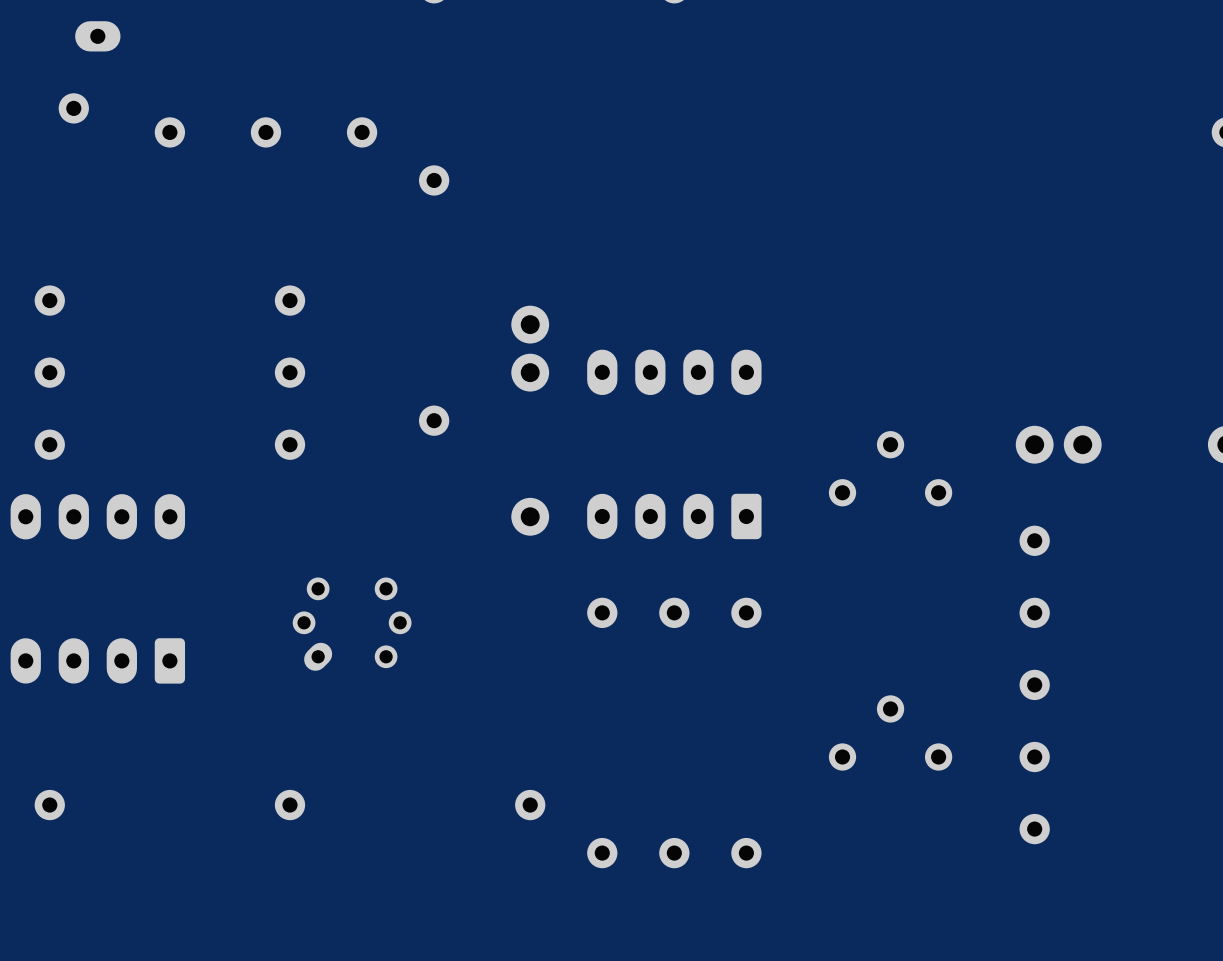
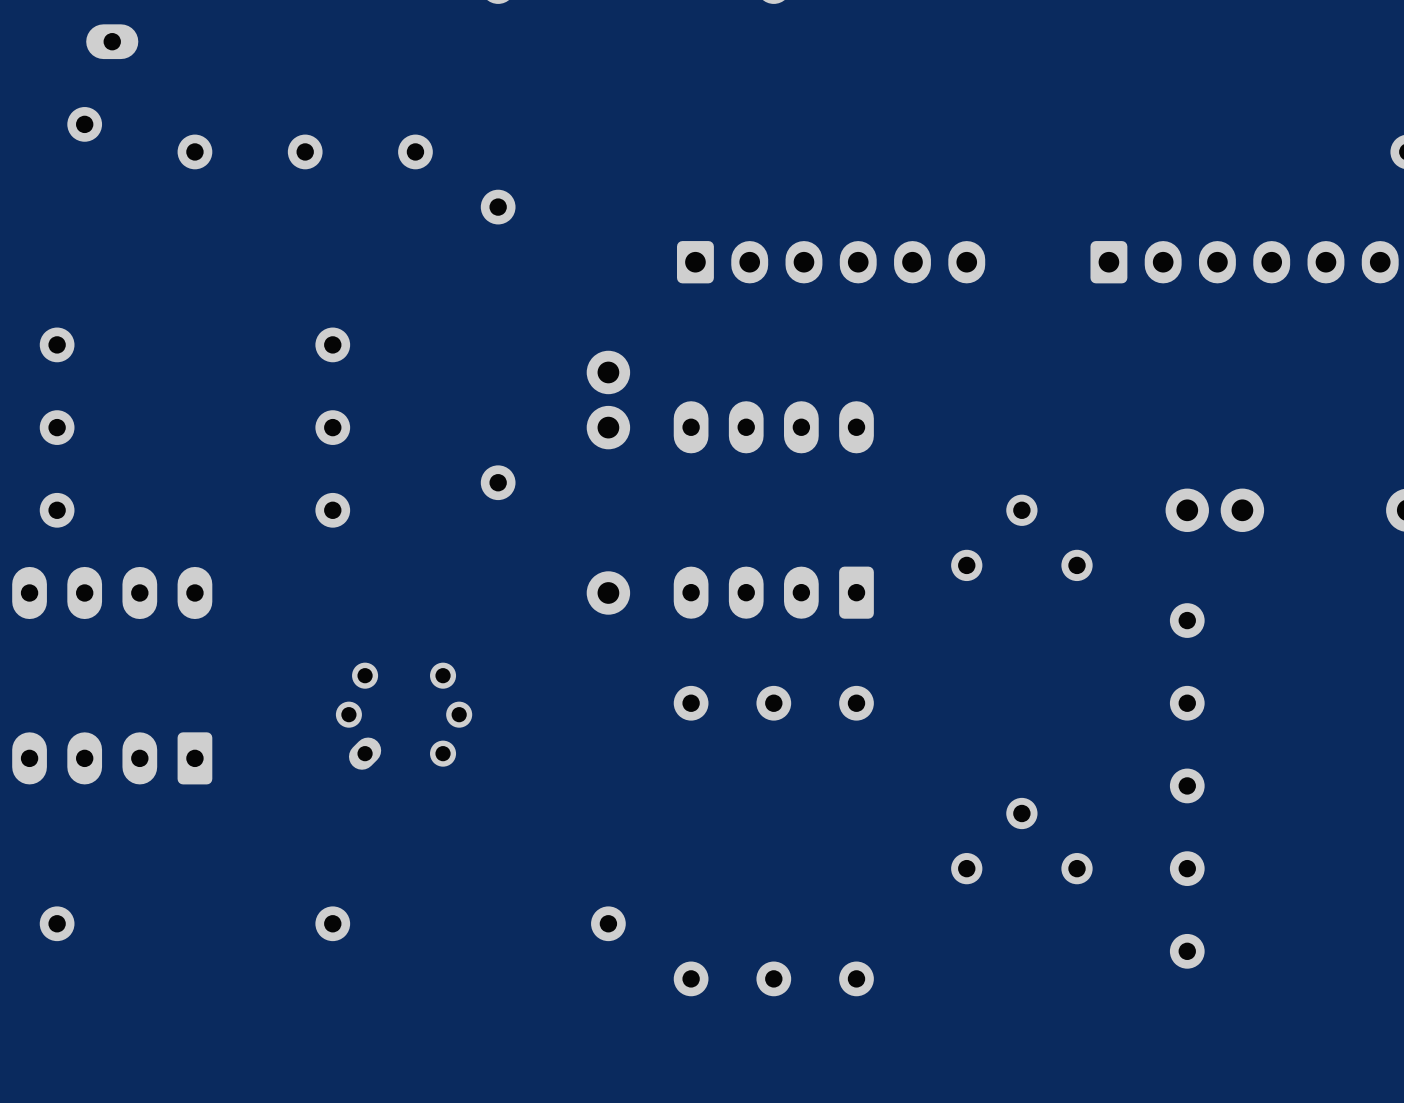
part: none -> (831, 262)
part: none -> (1244, 262)

